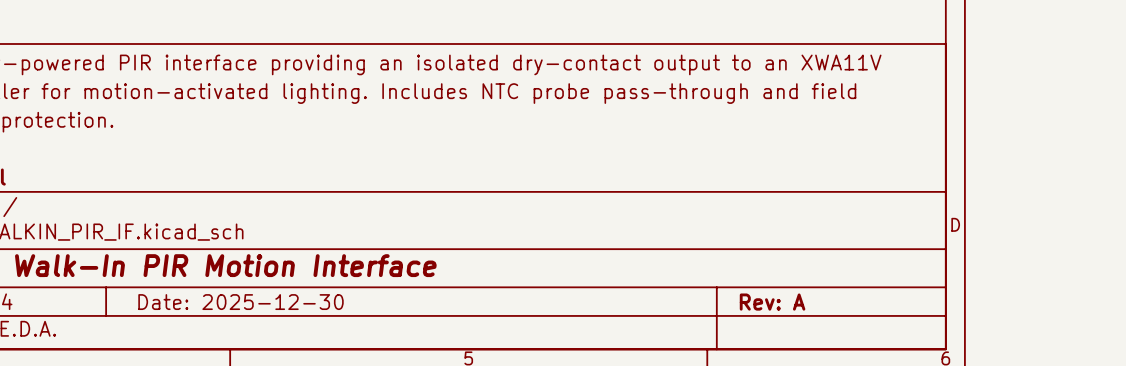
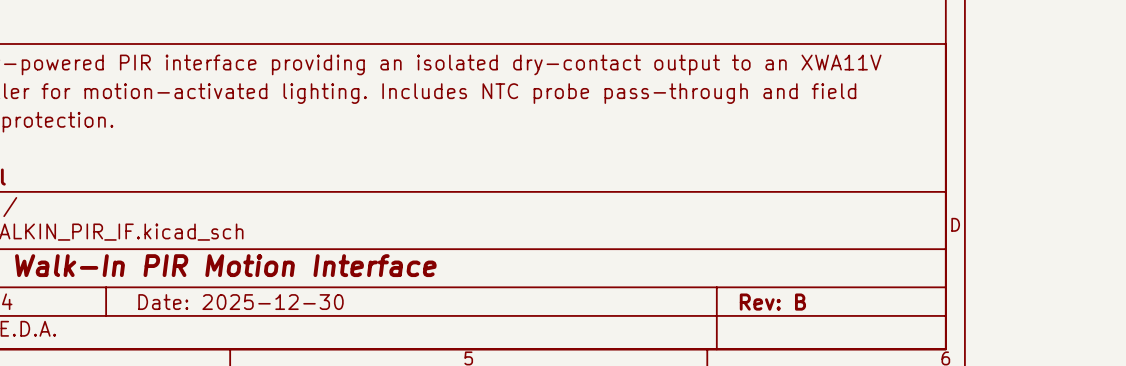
title block: Rev: A (772, 302) -> Rev: B (772, 302)

